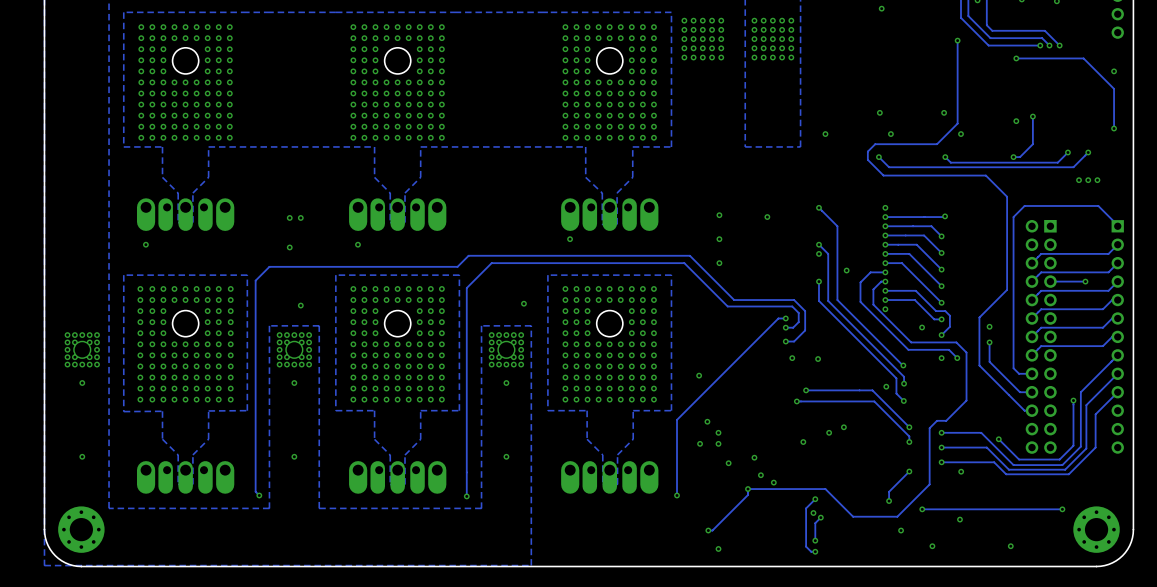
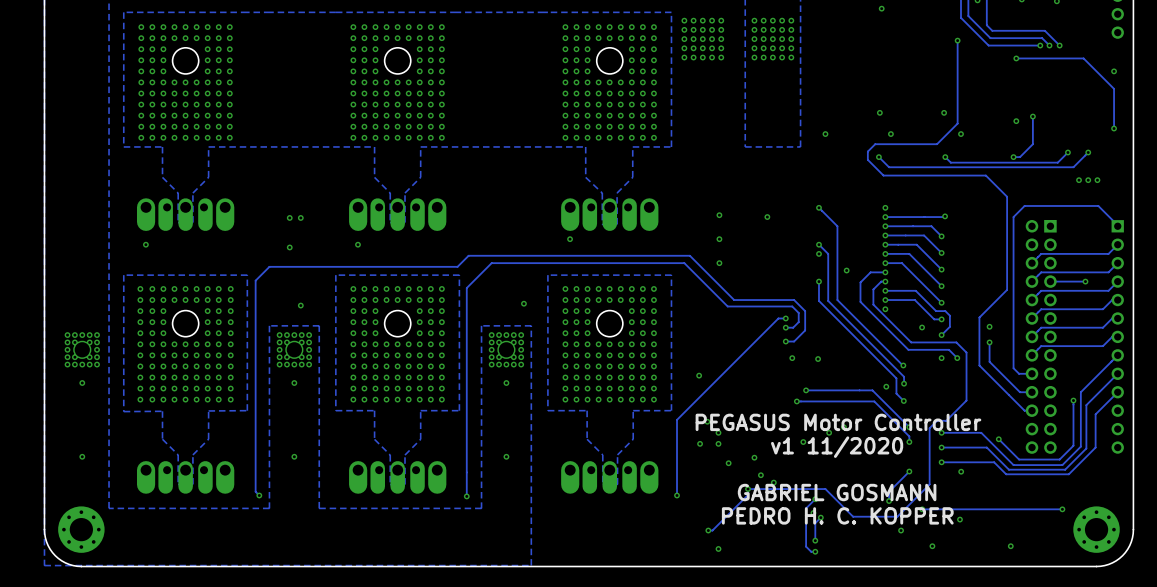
text: none -> PEGASUS Motor Controller (838, 422)
text: none -> v1 11/2020 (837, 447)
text: none -> GABRIEL GOSMANN (837, 492)
text: none -> PEDRO H. C. KOPPER (837, 515)

